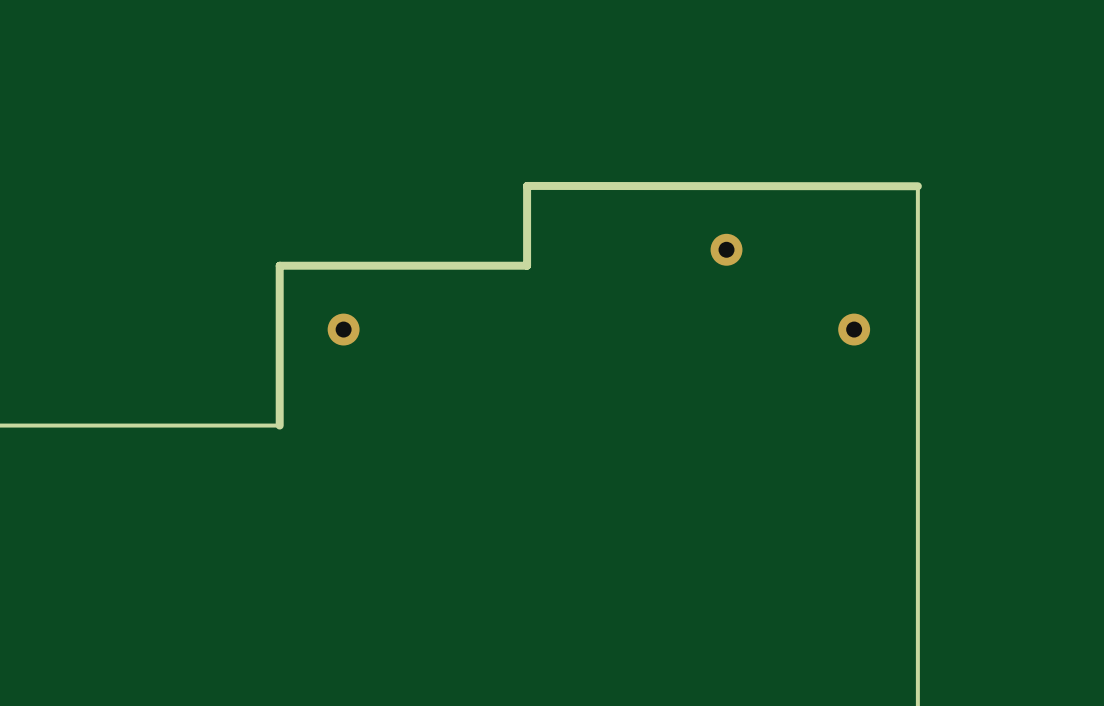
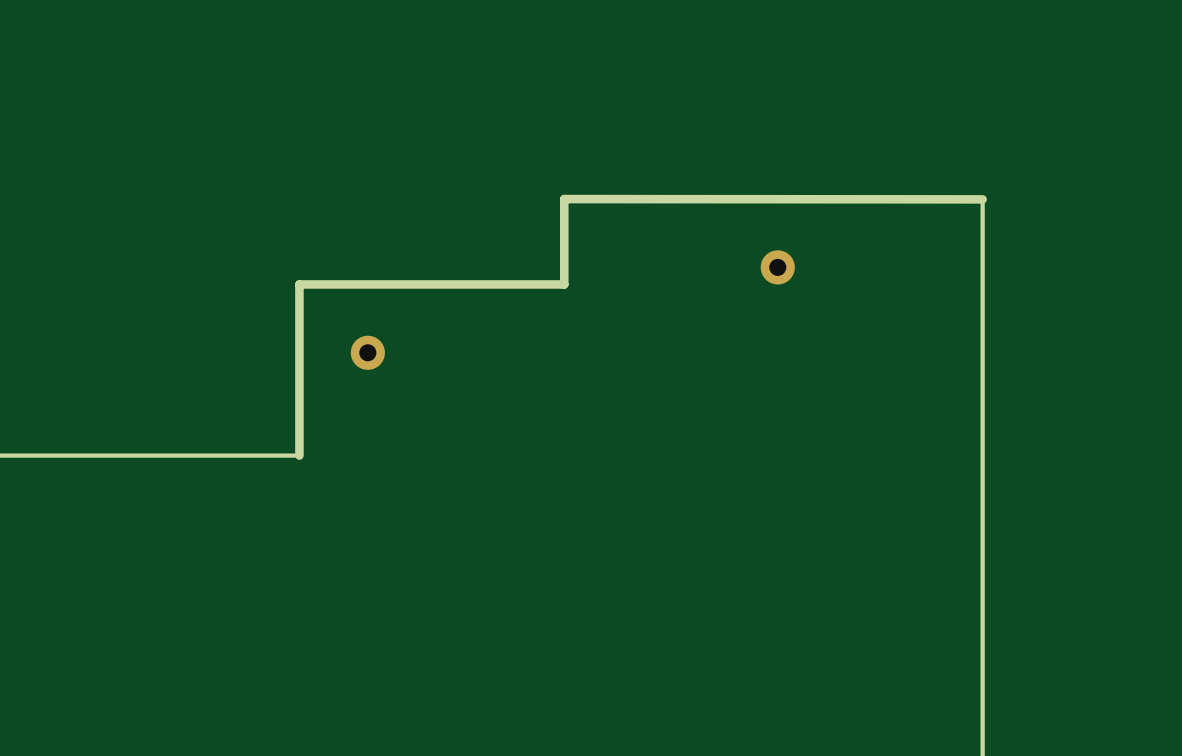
via: (854, 329) -> none

